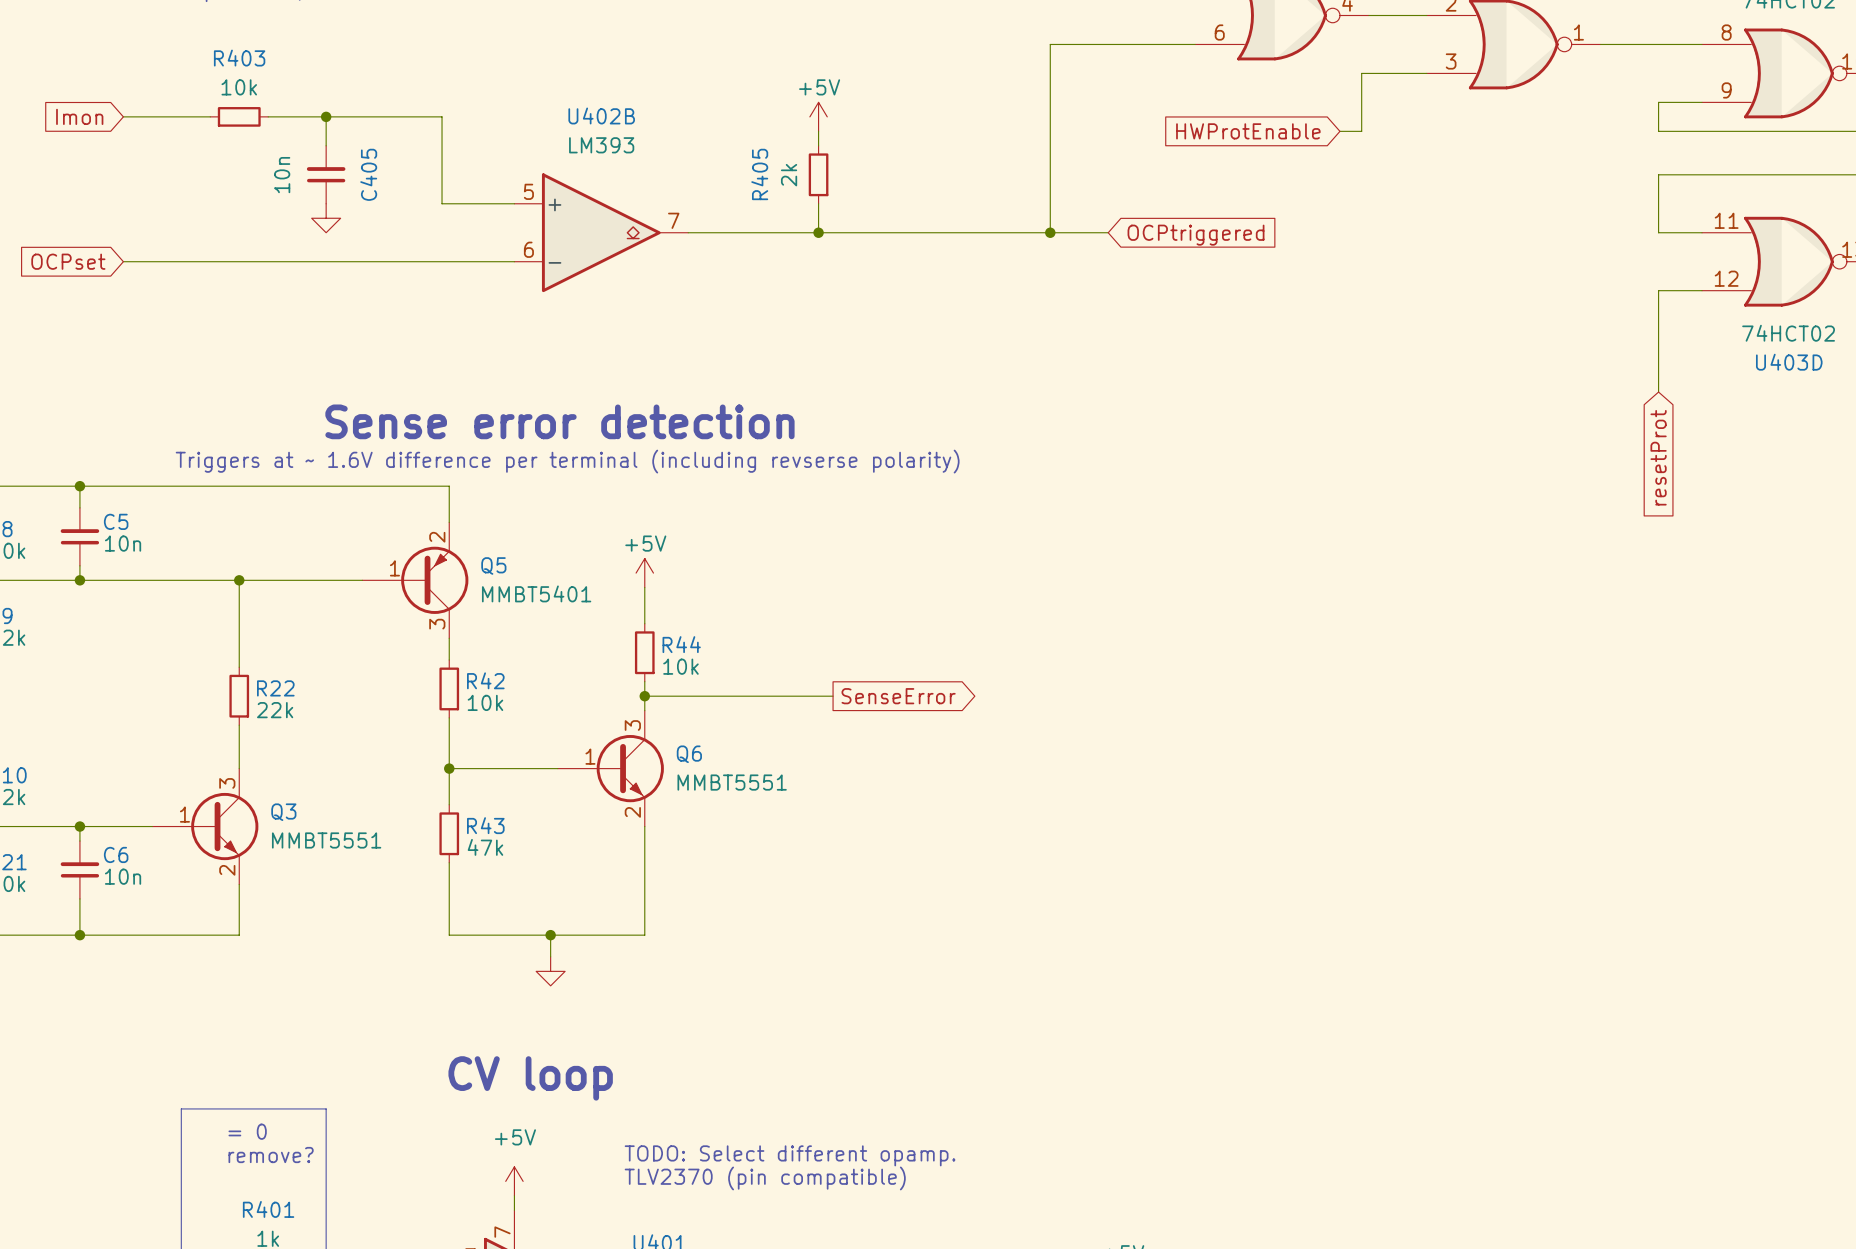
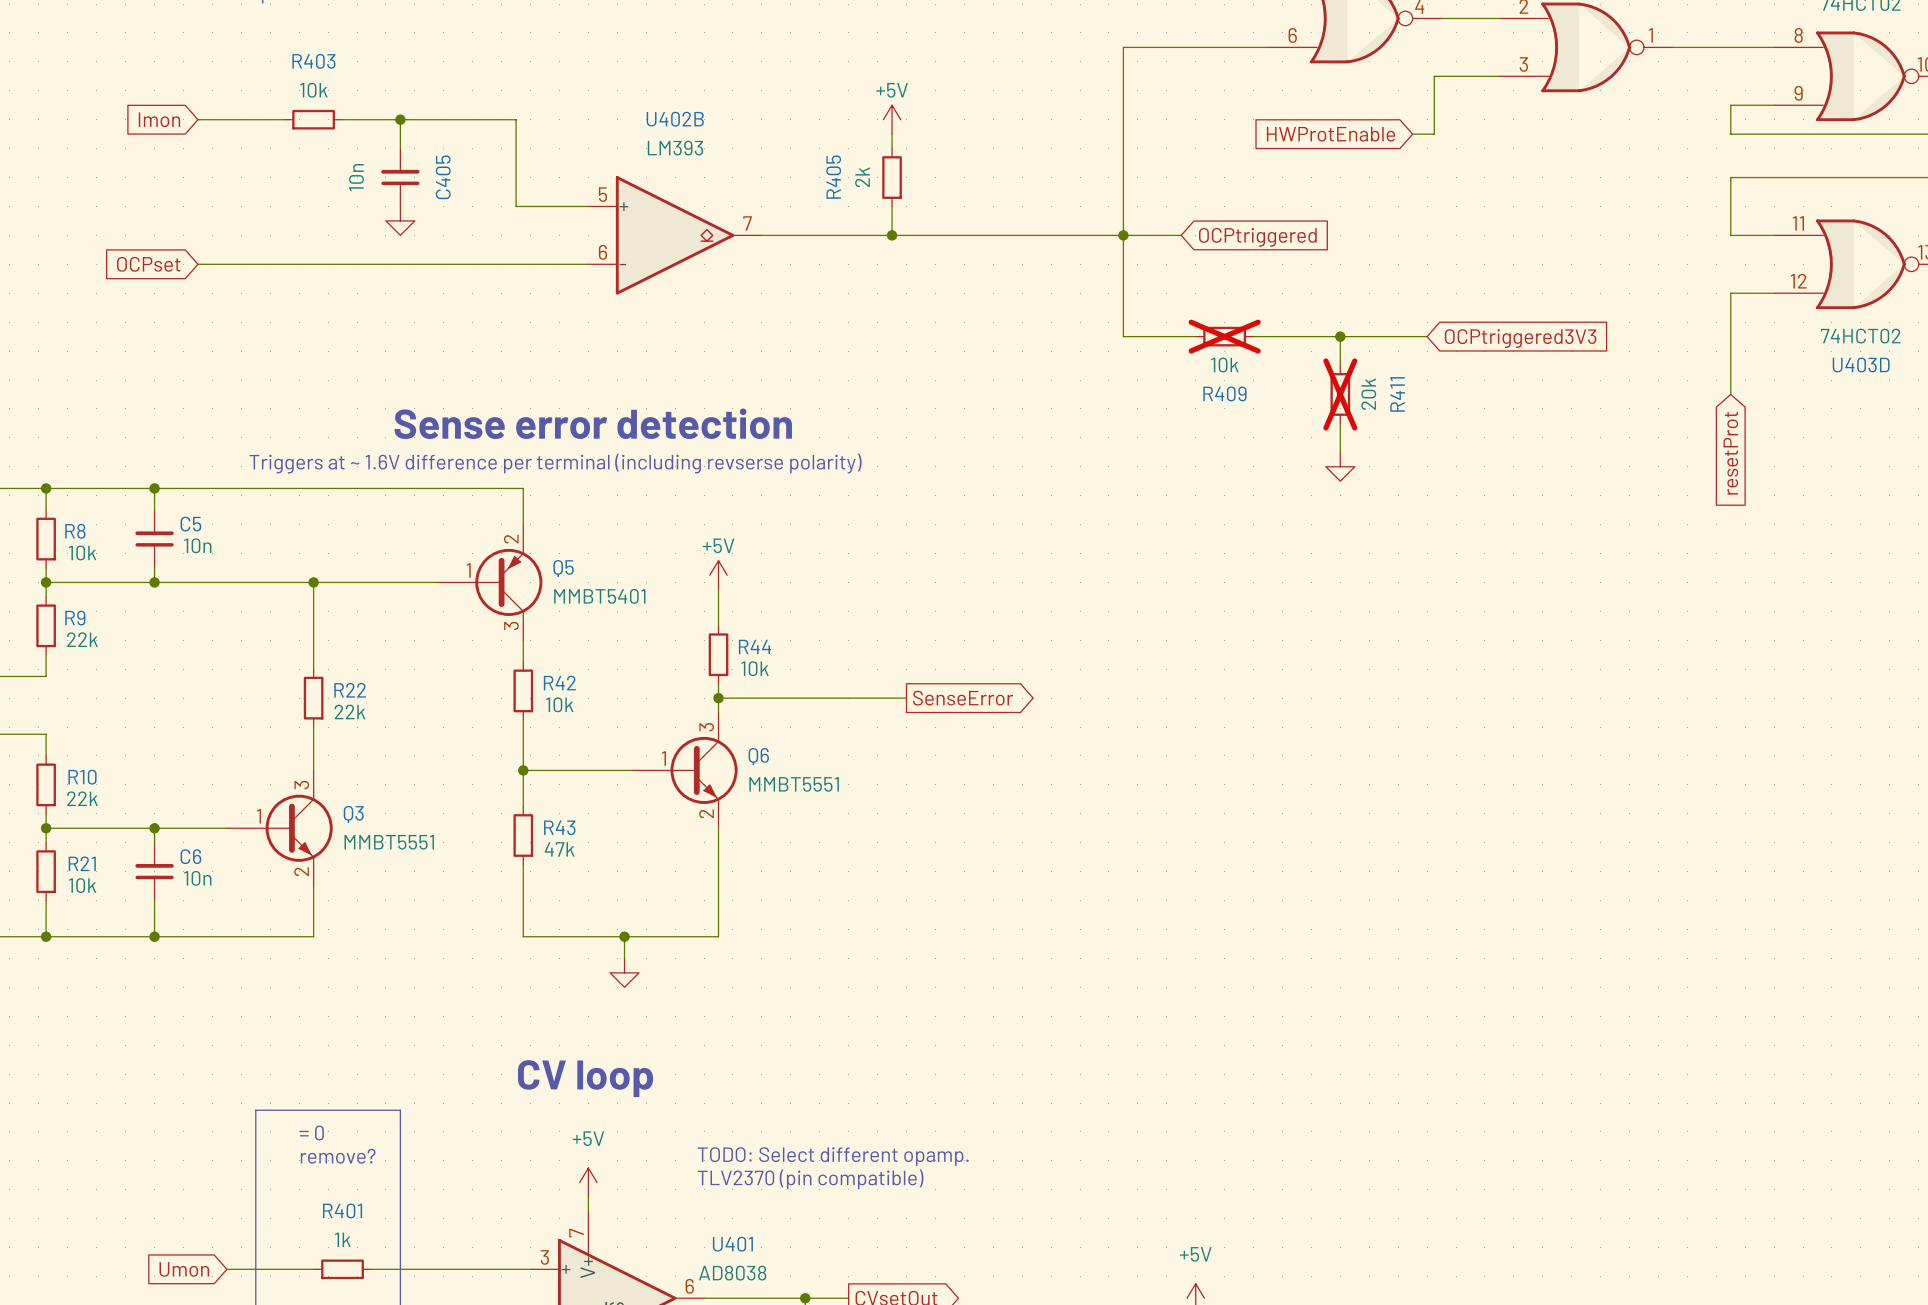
wire: none -> (1123, 235) (1123, 336) (1195, 336)
R409: none -> 10k (1224, 336)
wire: none -> (1253, 336) (1427, 336)
wire: none -> (1340, 336) (1340, 365)
junction: none -> (1340, 336)
global label: none -> OCPtriggered3V3 (1520, 338)
R411: none -> 20k (1340, 394)
wire: none -> (1340, 423) (1340, 452)
power symbol: none -> (1340, 466)

